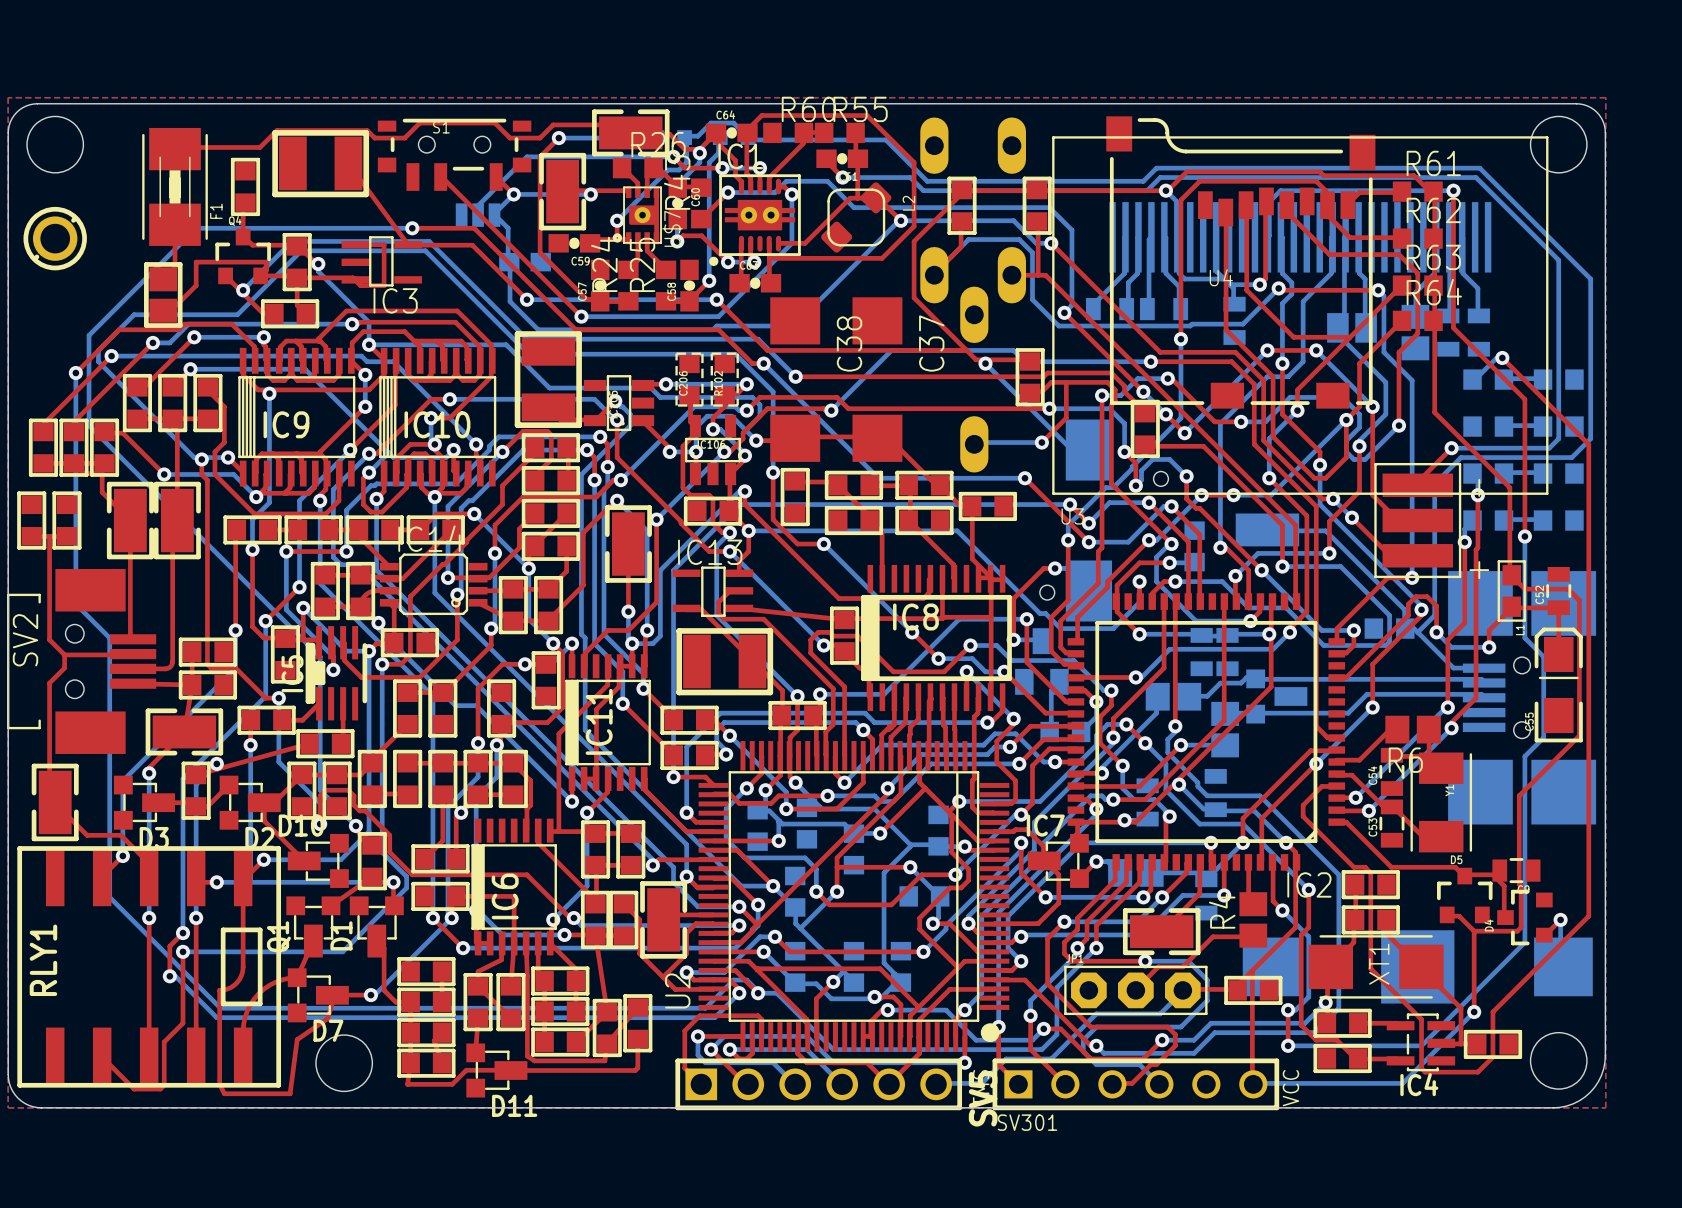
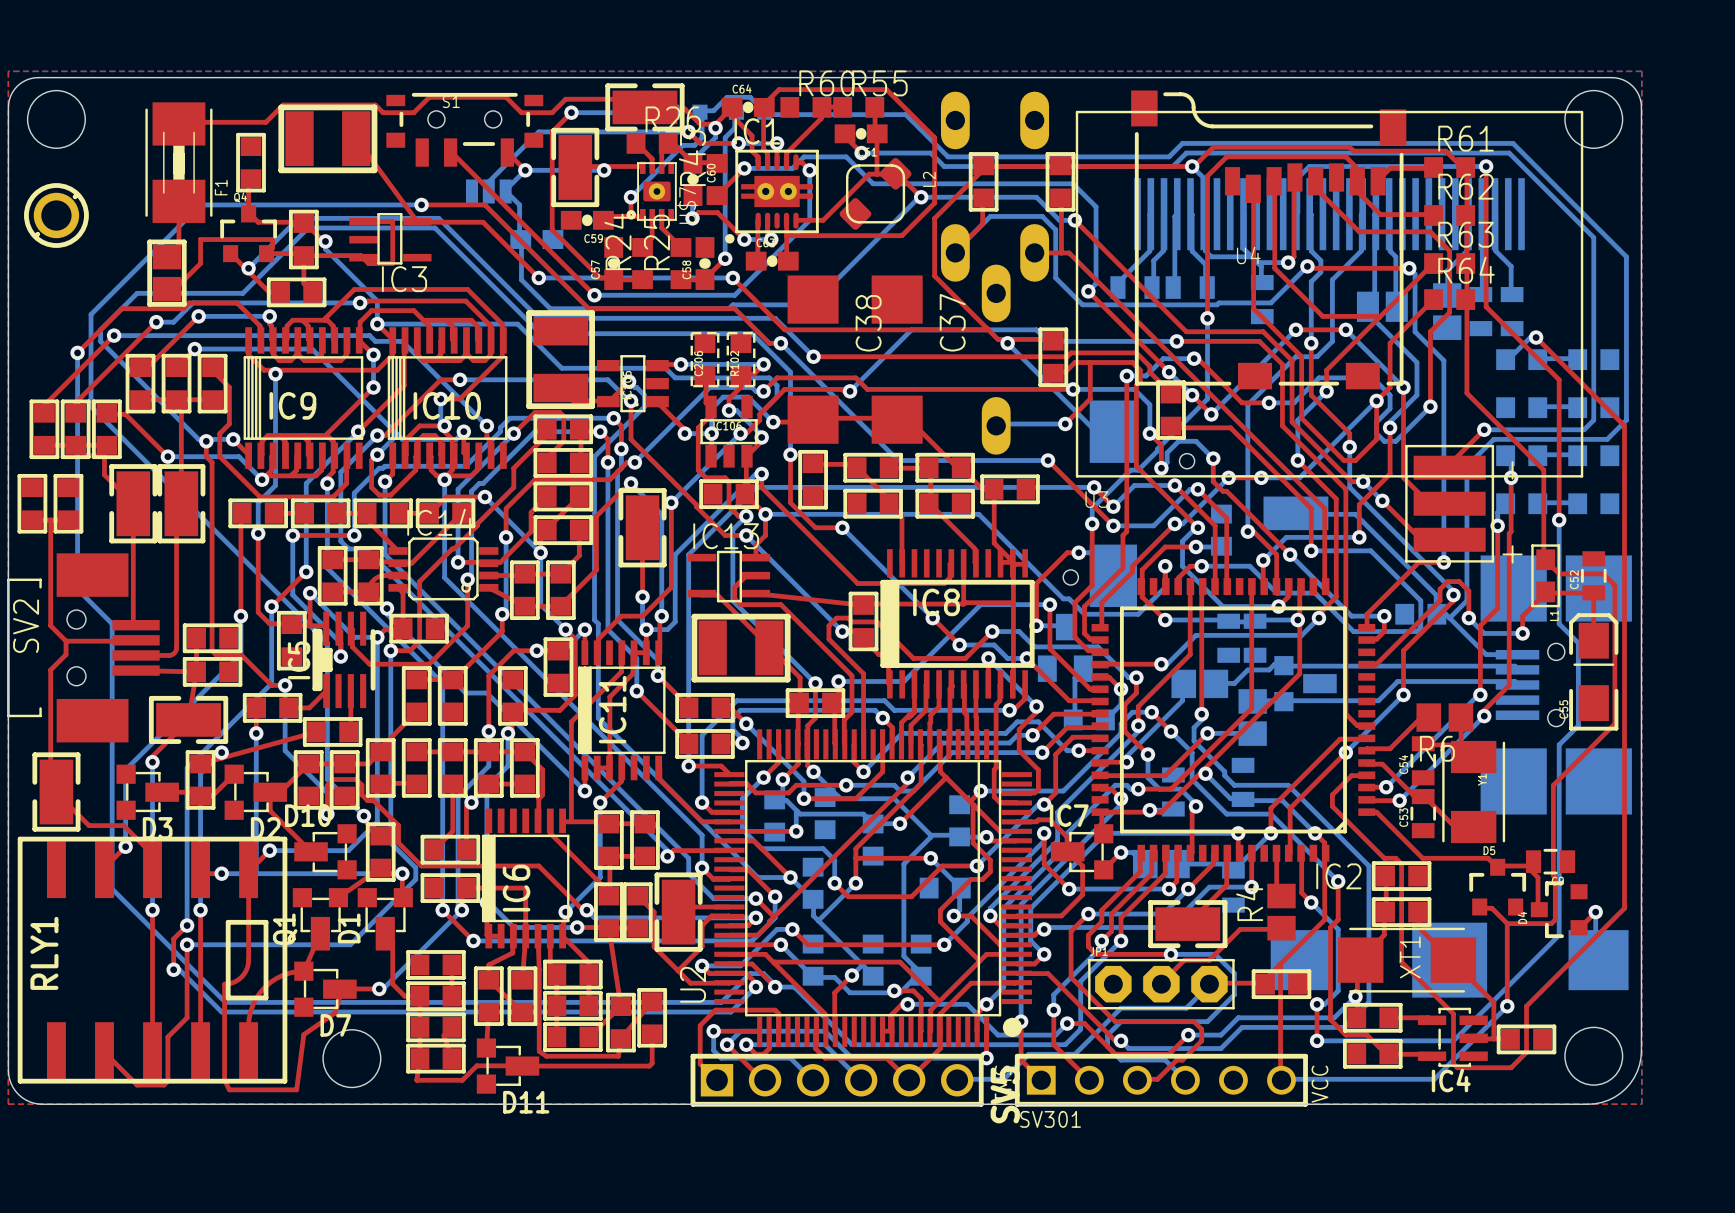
top track: (656, 192) (656, 237) -> none

